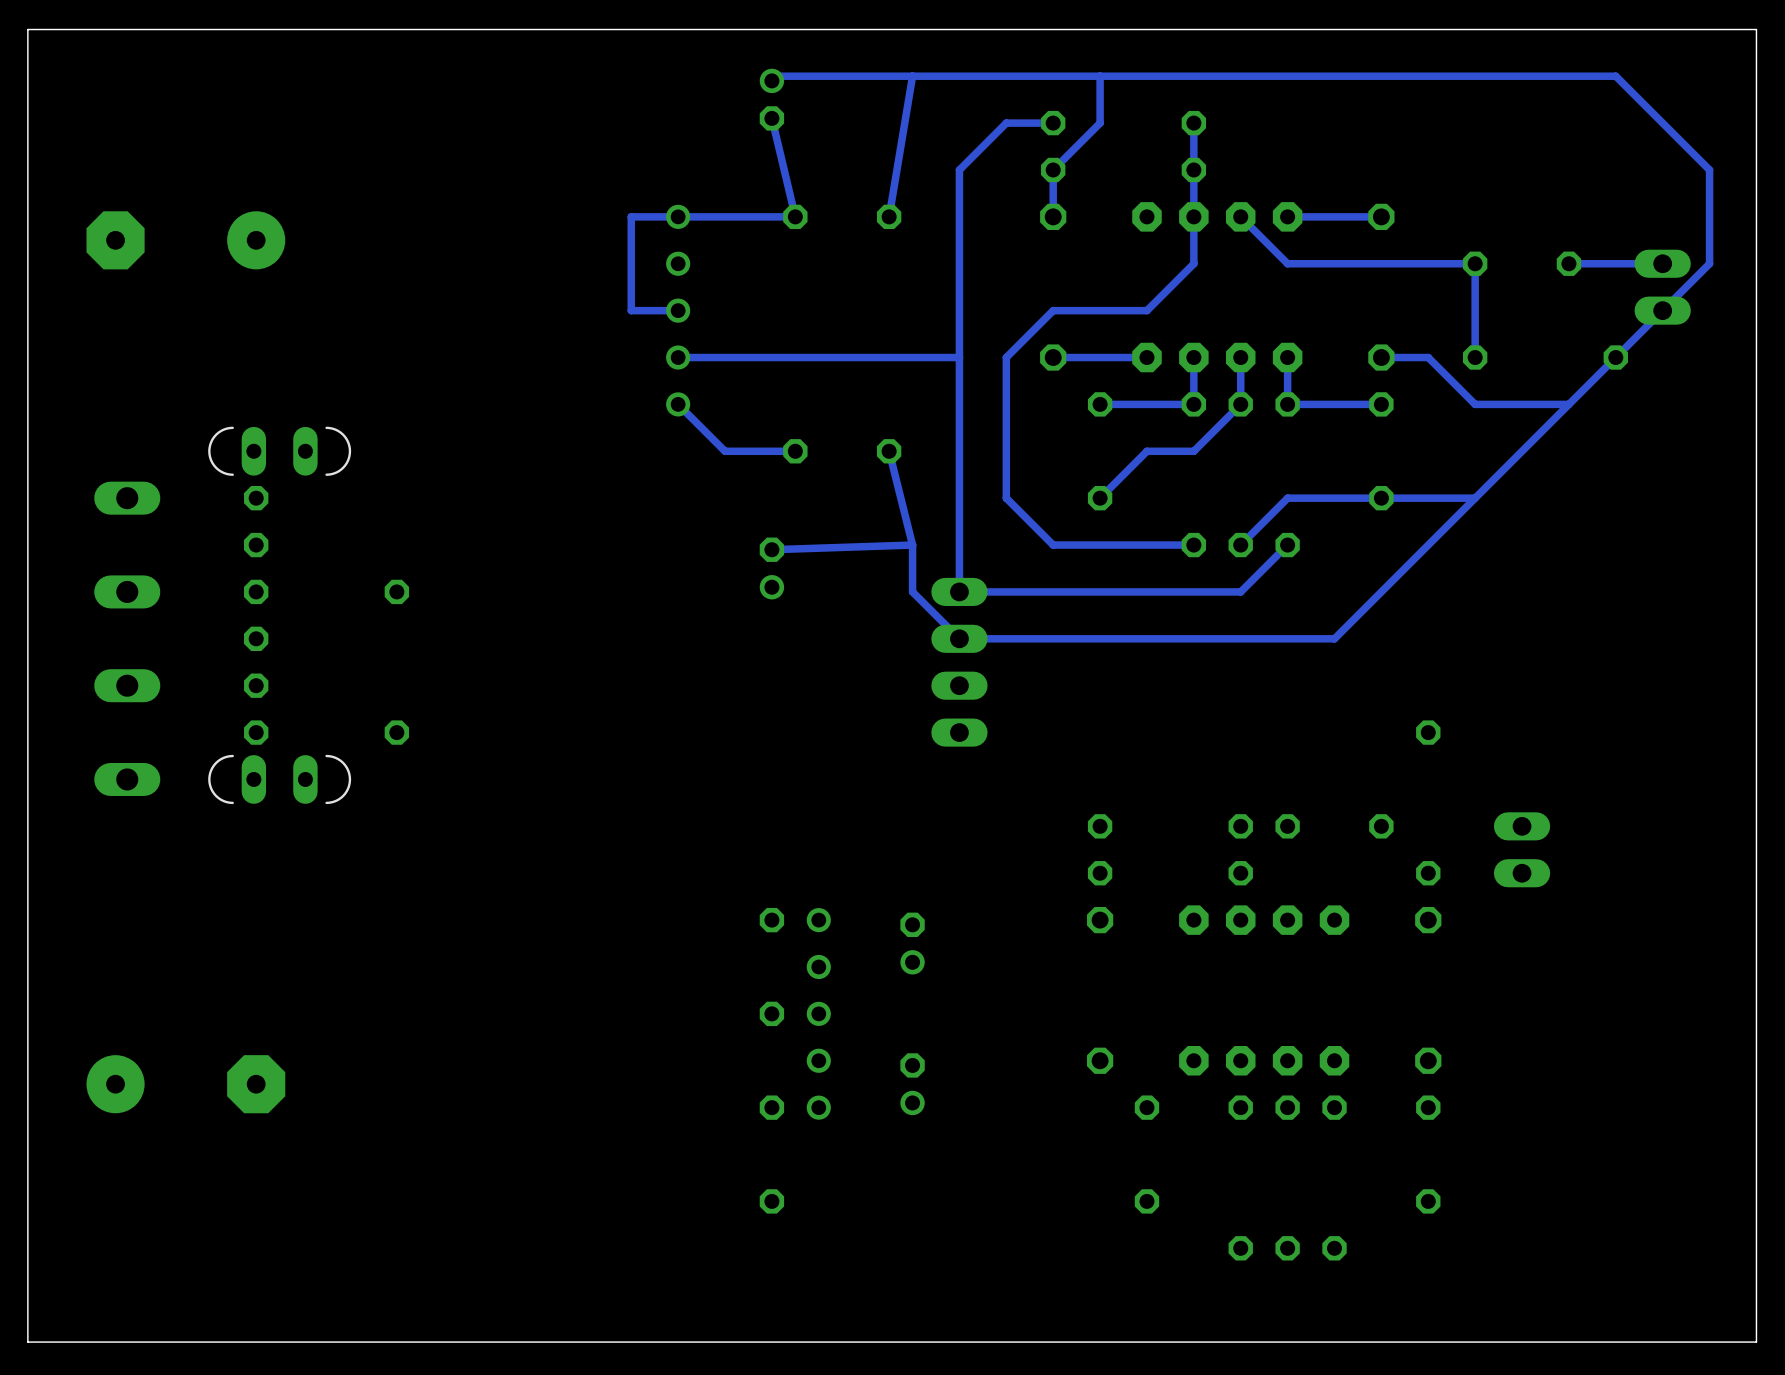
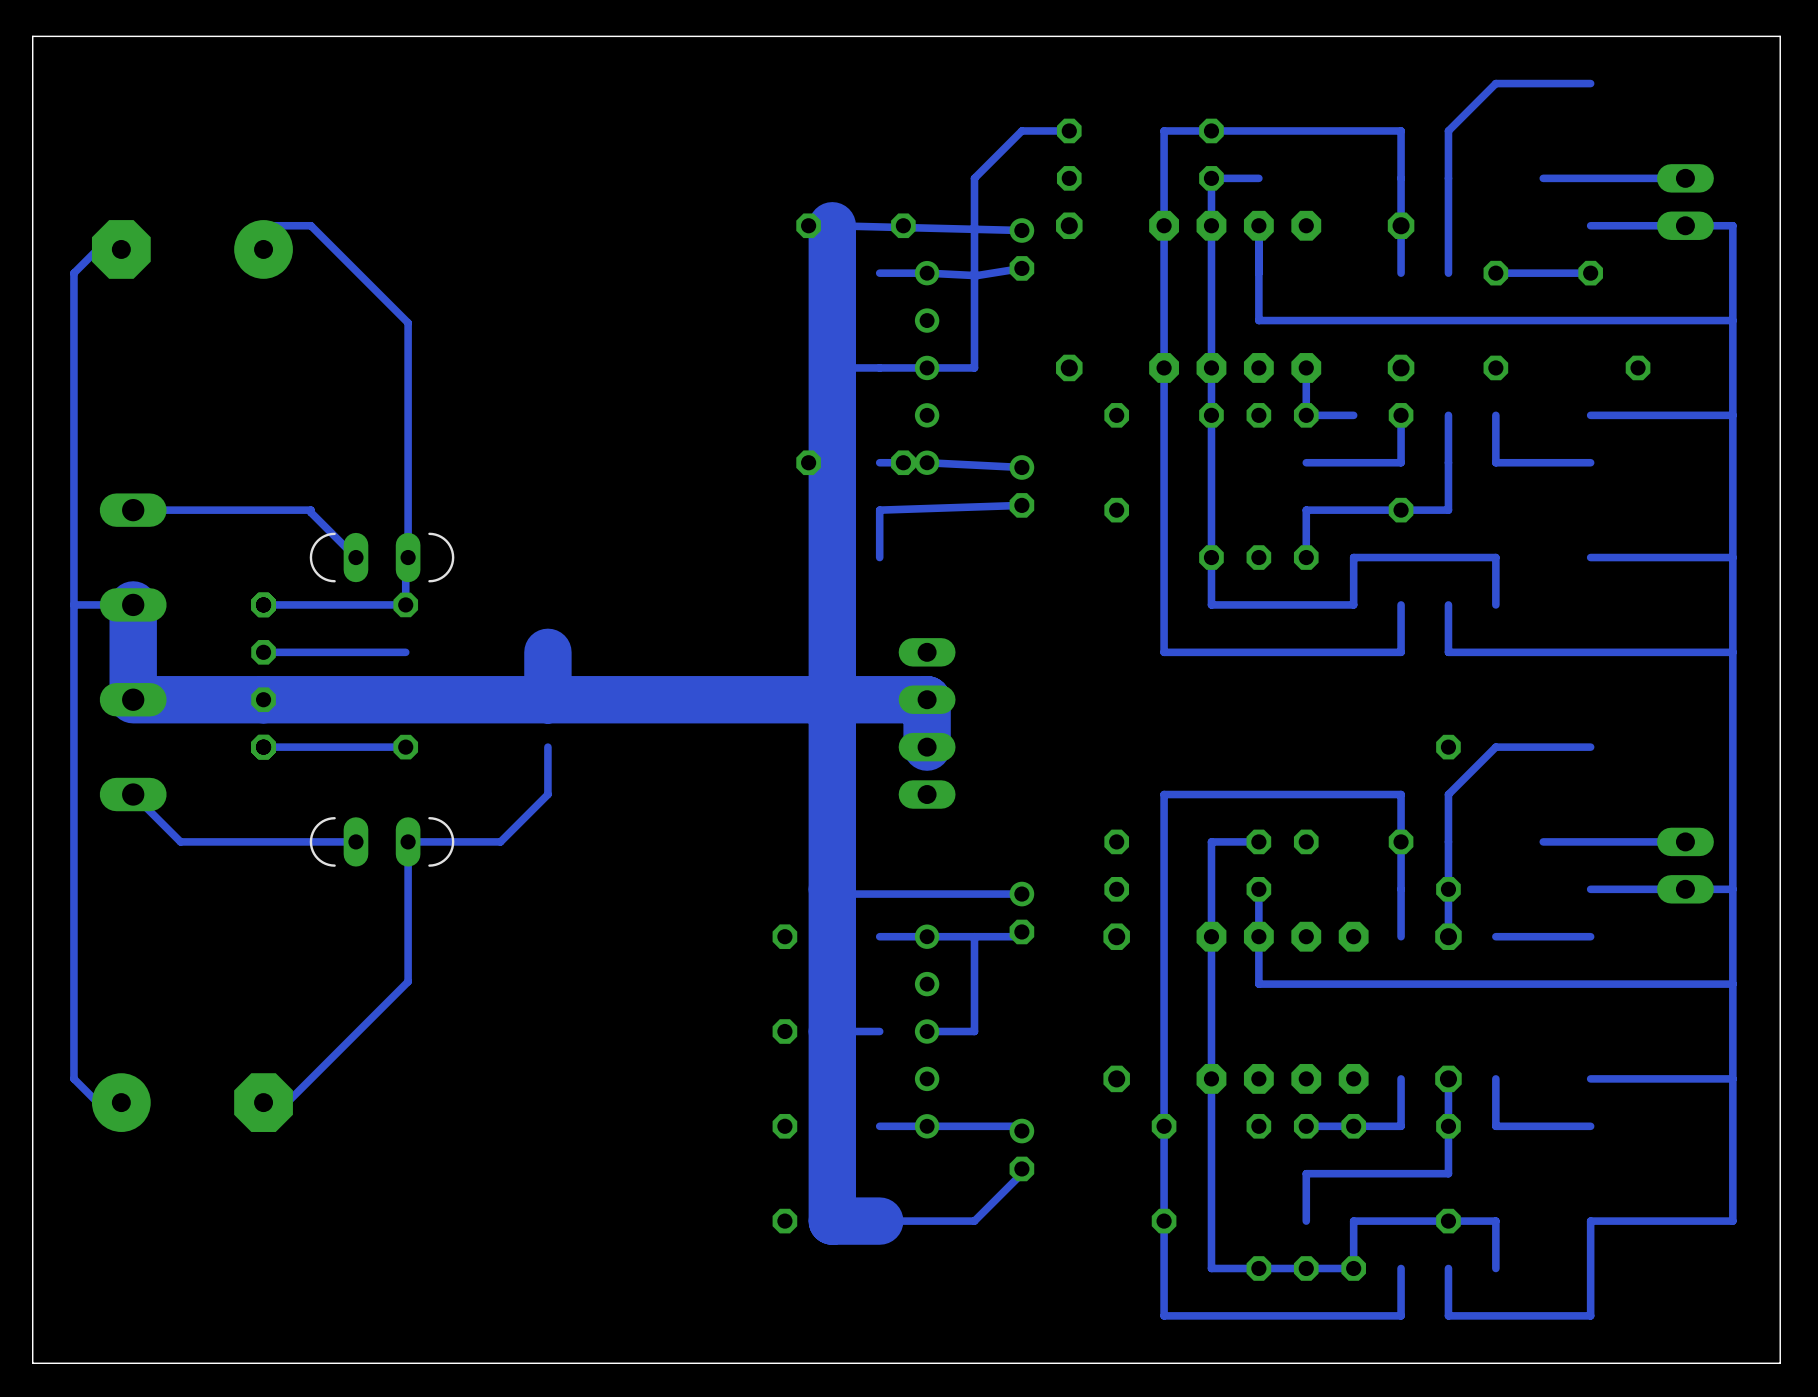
track: (912, 76) (889, 216) -> none
track: (1100, 76) (1100, 123) (1053, 169) (1053, 216) -> none
track: (1475, 76) (776, 76) (771, 80) -> (1495, 83) (1448, 130) (1448, 273)
track: (1568, 76) (1615, 76) (1709, 169) (1709, 216) -> (1590, 225) (1732, 225)
part: (771, 99) -> none
track: (771, 118) (795, 216) (631, 216) (631, 310) (678, 310) -> none
track: (1193, 123) (1193, 169) -> (1258, 178) (1211, 178)
track: none -> (1685, 178) (1543, 178)
track: none -> (121, 225) (73, 273) (73, 1078) (121, 1126)
track: none -> (263, 225) (310, 225) (408, 322) (408, 557) (405, 559) (405, 604) (263, 604)
track: (1240, 216) (1287, 263) (1475, 263) (1475, 357) -> (1258, 225) (1258, 320) (1732, 320)
track: (1381, 216) (1287, 216) -> none
track: none -> (1021, 230) (832, 225) (832, 1221) (974, 1221) (1021, 1173) (1021, 1168)
part: none -> (1021, 249)
track: none -> (1021, 268) (976, 275) (879, 273)
track: (1193, 263) (1146, 310) (1053, 310) (1006, 357) (1006, 498) (1053, 545) (1193, 545) -> (1211, 273) (1211, 367)
track: (1662, 263) (1568, 263) -> (1495, 273) (1590, 273)
track: (1709, 263) (1334, 638) -> (1401, 604) (1401, 652) (1353, 652)
track: none -> (1732, 273) (1732, 1221) (1590, 1221) (1590, 1315) (1448, 1315) (1448, 1268)
part position: (1662, 287) -> (1685, 202)
part position: (678, 310) -> (927, 367)
track: (818, 357) (678, 357) -> none
track: (959, 357) (959, 591) (1193, 591) -> none
track: (1146, 357) (1053, 357) -> none
track: (1240, 357) (1240, 404) (1193, 451) (1146, 451) (1100, 498) -> none
track: (1381, 357) (1428, 357) (1475, 404) (1568, 404) -> (1732, 415) (1590, 415)
track: (678, 404) (725, 451) (795, 451) -> none
track: (1193, 404) (1100, 404) -> (1211, 415) (1211, 604)
track: (1381, 404) (1334, 404) -> (1401, 415) (1401, 462) (1306, 462)
track: none -> (1495, 415) (1495, 462) (1590, 462)
part: (279, 451) -> none
track: none -> (879, 462) (927, 462) (1021, 467)
track: (889, 451) (912, 545) -> none
part: none -> (1021, 486)
track: none -> (1021, 505) (879, 510) (879, 557)
track: none -> (133, 510) (310, 510) (310, 512) (355, 557)
track: (1287, 498) (1240, 545) -> (1306, 510) (1306, 557)
track: (1475, 498) (1428, 498) -> (1448, 415) (1448, 510)
part: (256, 521) -> none
part: none -> (382, 557)
track: (912, 545) (912, 591) (959, 638) (1146, 638) -> (1401, 273) (1401, 130) (1164, 130) (1164, 652)
track: (912, 545) (771, 549) -> none
track: (1287, 545) (1240, 591) -> (1495, 604) (1495, 557) (1353, 557) (1353, 604) (1258, 604)
track: none -> (1732, 557) (1590, 557)
part: (771, 568) -> none
track: none -> (73, 604) (133, 604) (133, 687) (121, 699) (927, 699) (927, 747)
track: none -> (1448, 604) (1448, 652) (1732, 652)
part: none -> (263, 628)
part: (959, 615) -> none
track: none -> (405, 652) (263, 652)
track: none -> (547, 652) (547, 699)
part: (256, 662) -> none
part: none -> (927, 676)
part: none -> (263, 723)
part: (959, 709) -> none
track: none -> (405, 747) (263, 747)
track: none -> (547, 747) (547, 794) (500, 841) (408, 841) (408, 981) (263, 1126)
track: none -> (1590, 747) (1495, 747) (1448, 794) (1448, 936)
part: none -> (927, 770)
track: none -> (133, 794) (180, 841) (355, 841)
part position: (279, 779) -> (382, 841)
track: none -> (1258, 841) (1211, 841) (1211, 1268) (1353, 1268) (1353, 1221) (1495, 1221) (1495, 1268)
track: none -> (1685, 841) (1543, 841)
part position: (1522, 849) -> (1685, 865)
track: none -> (832, 889) (837, 894) (1021, 894)
track: none -> (1258, 889) (1258, 984) (1732, 984)
track: none -> (1732, 889) (1590, 889)
part: none -> (1021, 913)
track: none -> (1021, 931) (1017, 936) (879, 936)
track: none -> (974, 936) (974, 1031) (927, 1031)
track: none -> (1401, 936) (1401, 794) (1164, 794) (1164, 1315) (1401, 1315) (1401, 1268)
track: none -> (1590, 936) (1495, 936)
part: (912, 943) -> none
part position: (818, 1013) -> (927, 1031)
track: none -> (879, 1031) (832, 1031)
track: none -> (1401, 1078) (1401, 1126) (1306, 1126)
track: none -> (1448, 1078) (1448, 1173) (1306, 1173) (1306, 1221)
track: none -> (1495, 1078) (1495, 1126) (1590, 1126)
track: none -> (1732, 1078) (1590, 1078)
part: (912, 1084) -> none
track: none -> (879, 1126) (1017, 1126) (1021, 1131)
part: none -> (1021, 1149)

